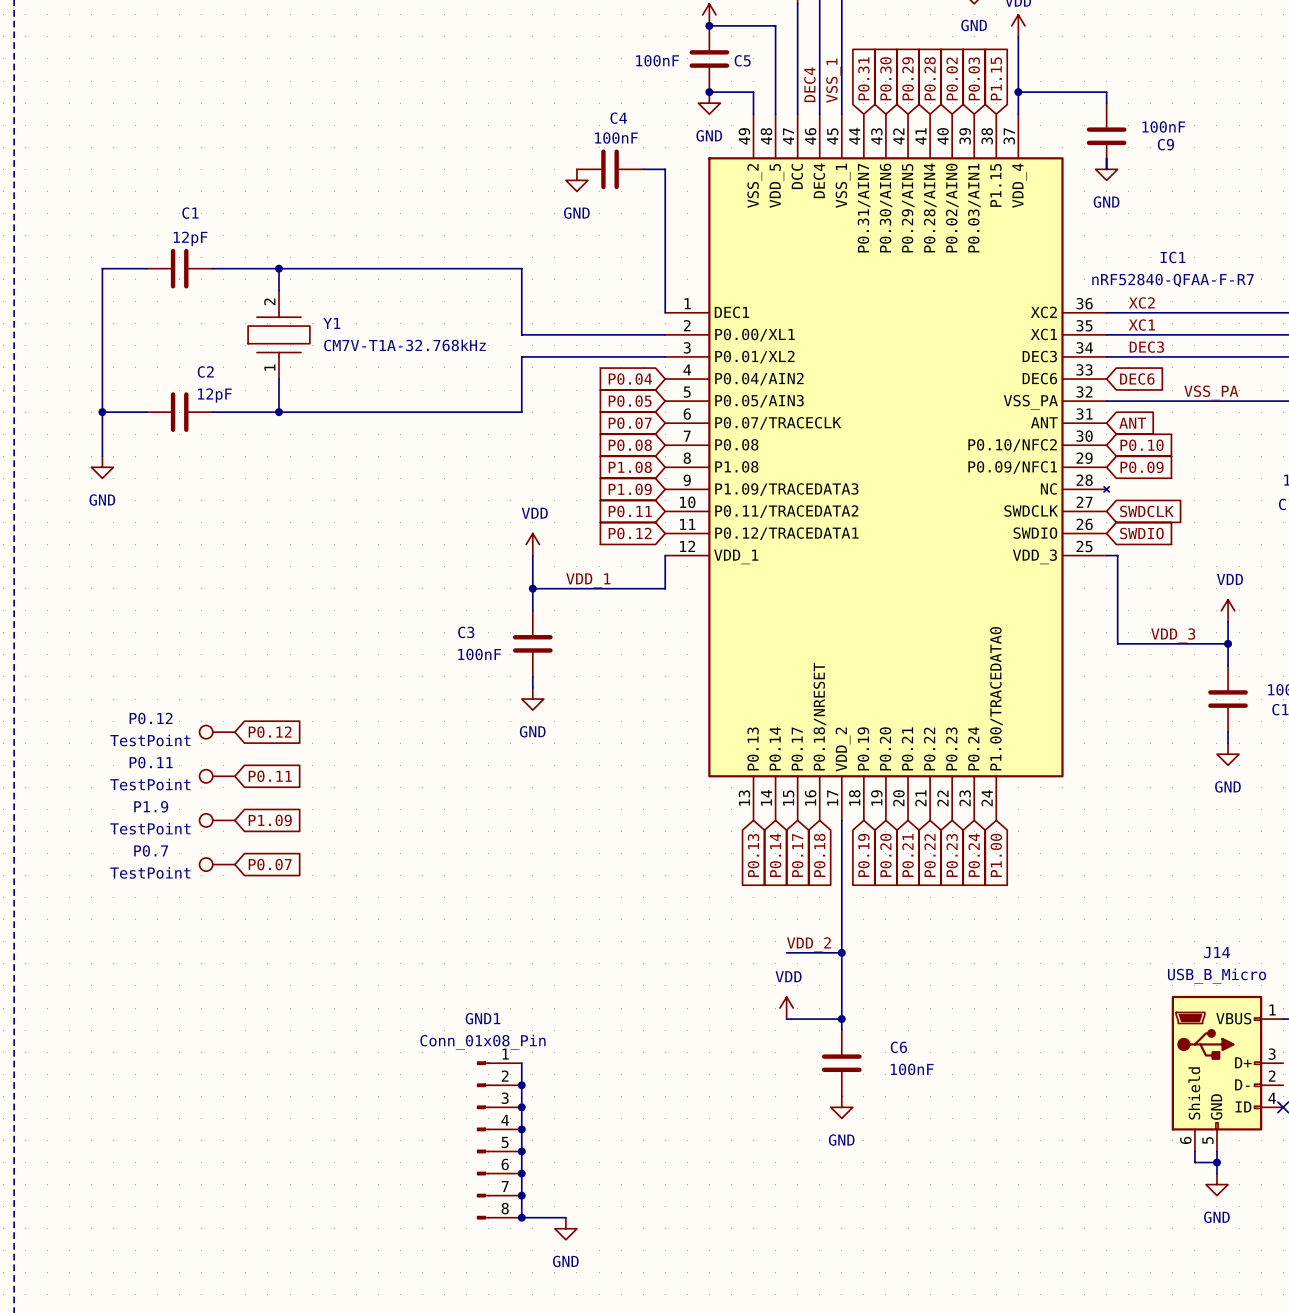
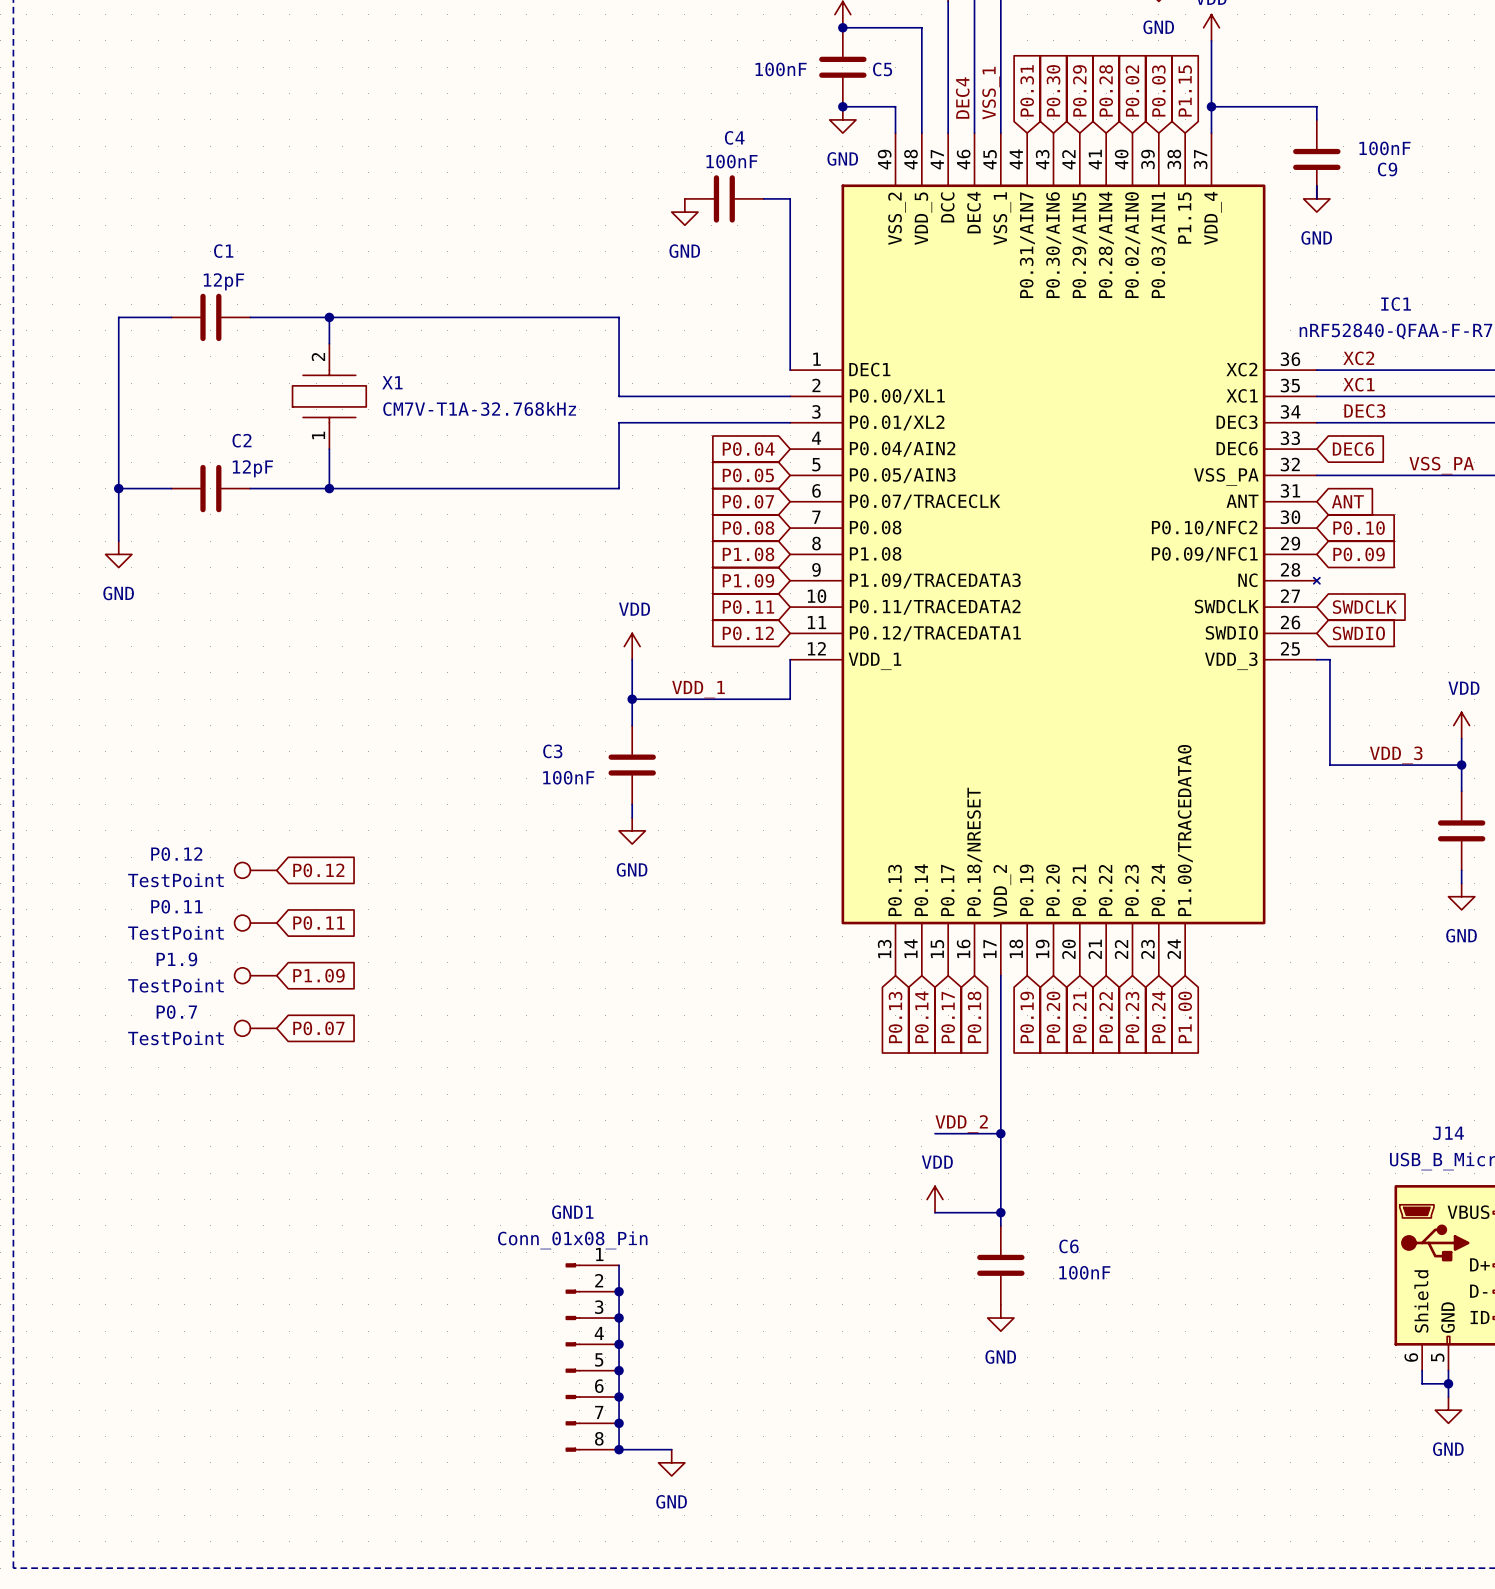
Y1 name: Y1 (331, 323) -> X1 (392, 382)

